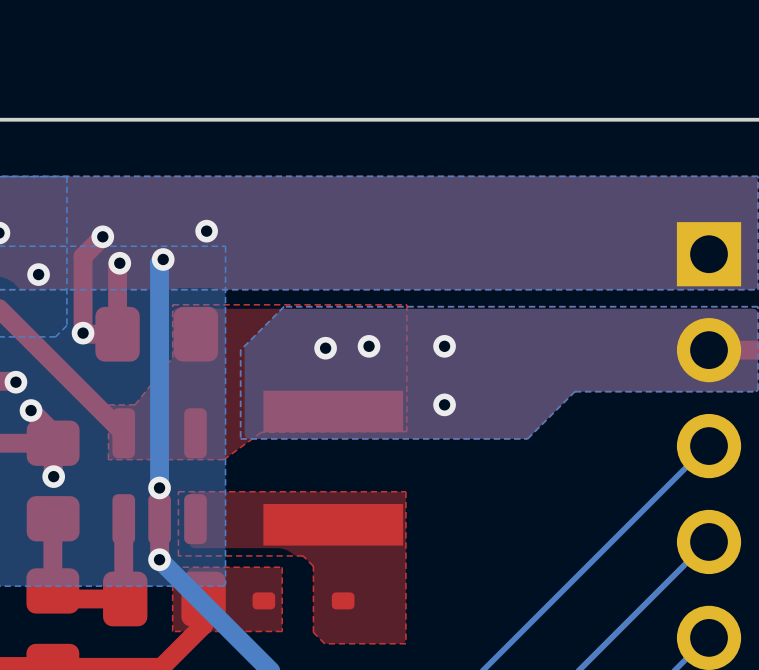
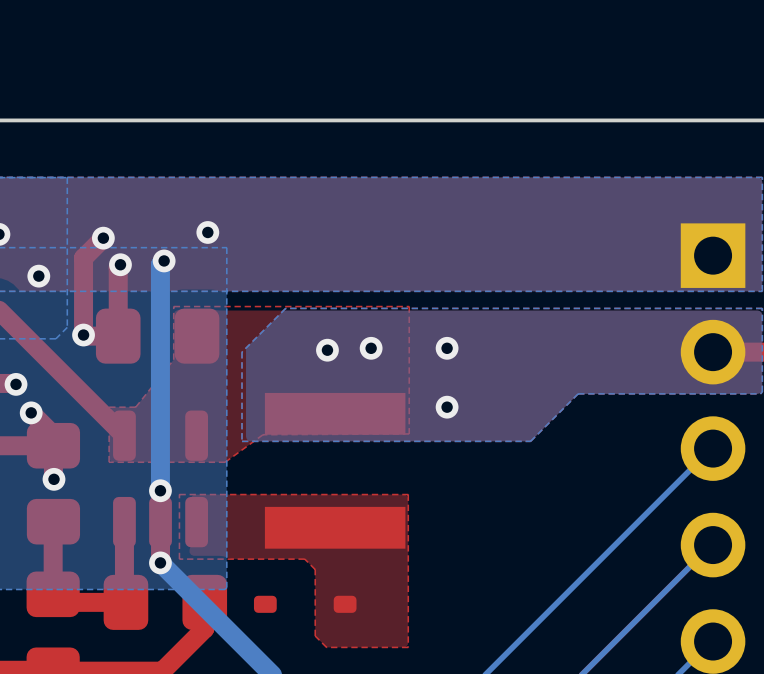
top zone outline: (282, 567) (282, 631) (172, 631) (172, 567) (282, 567) -> none

